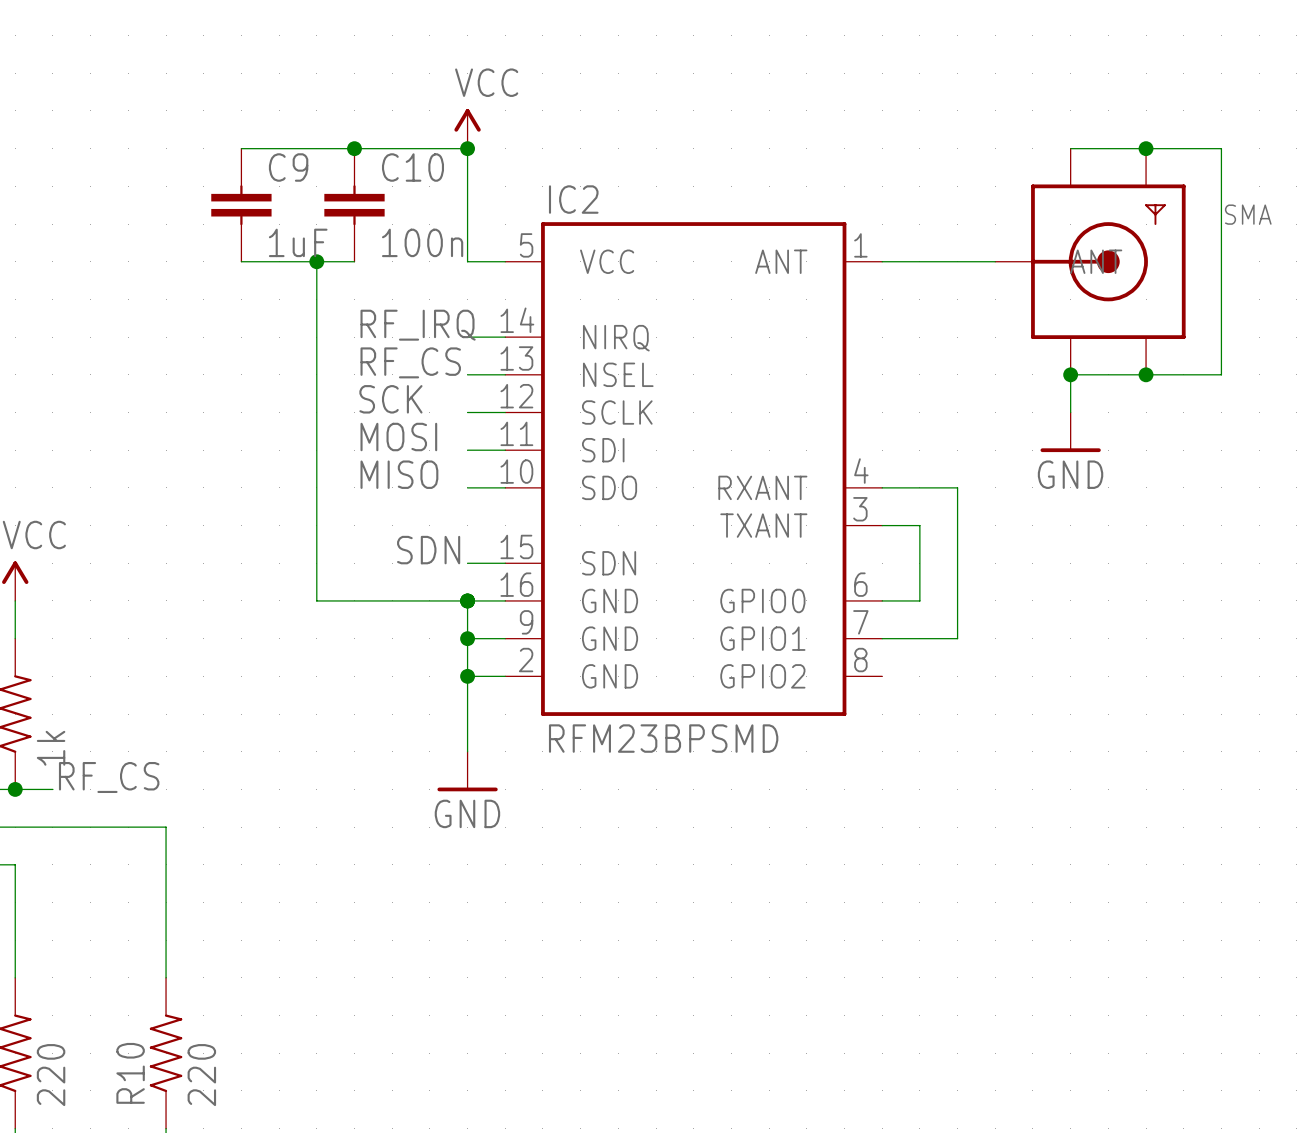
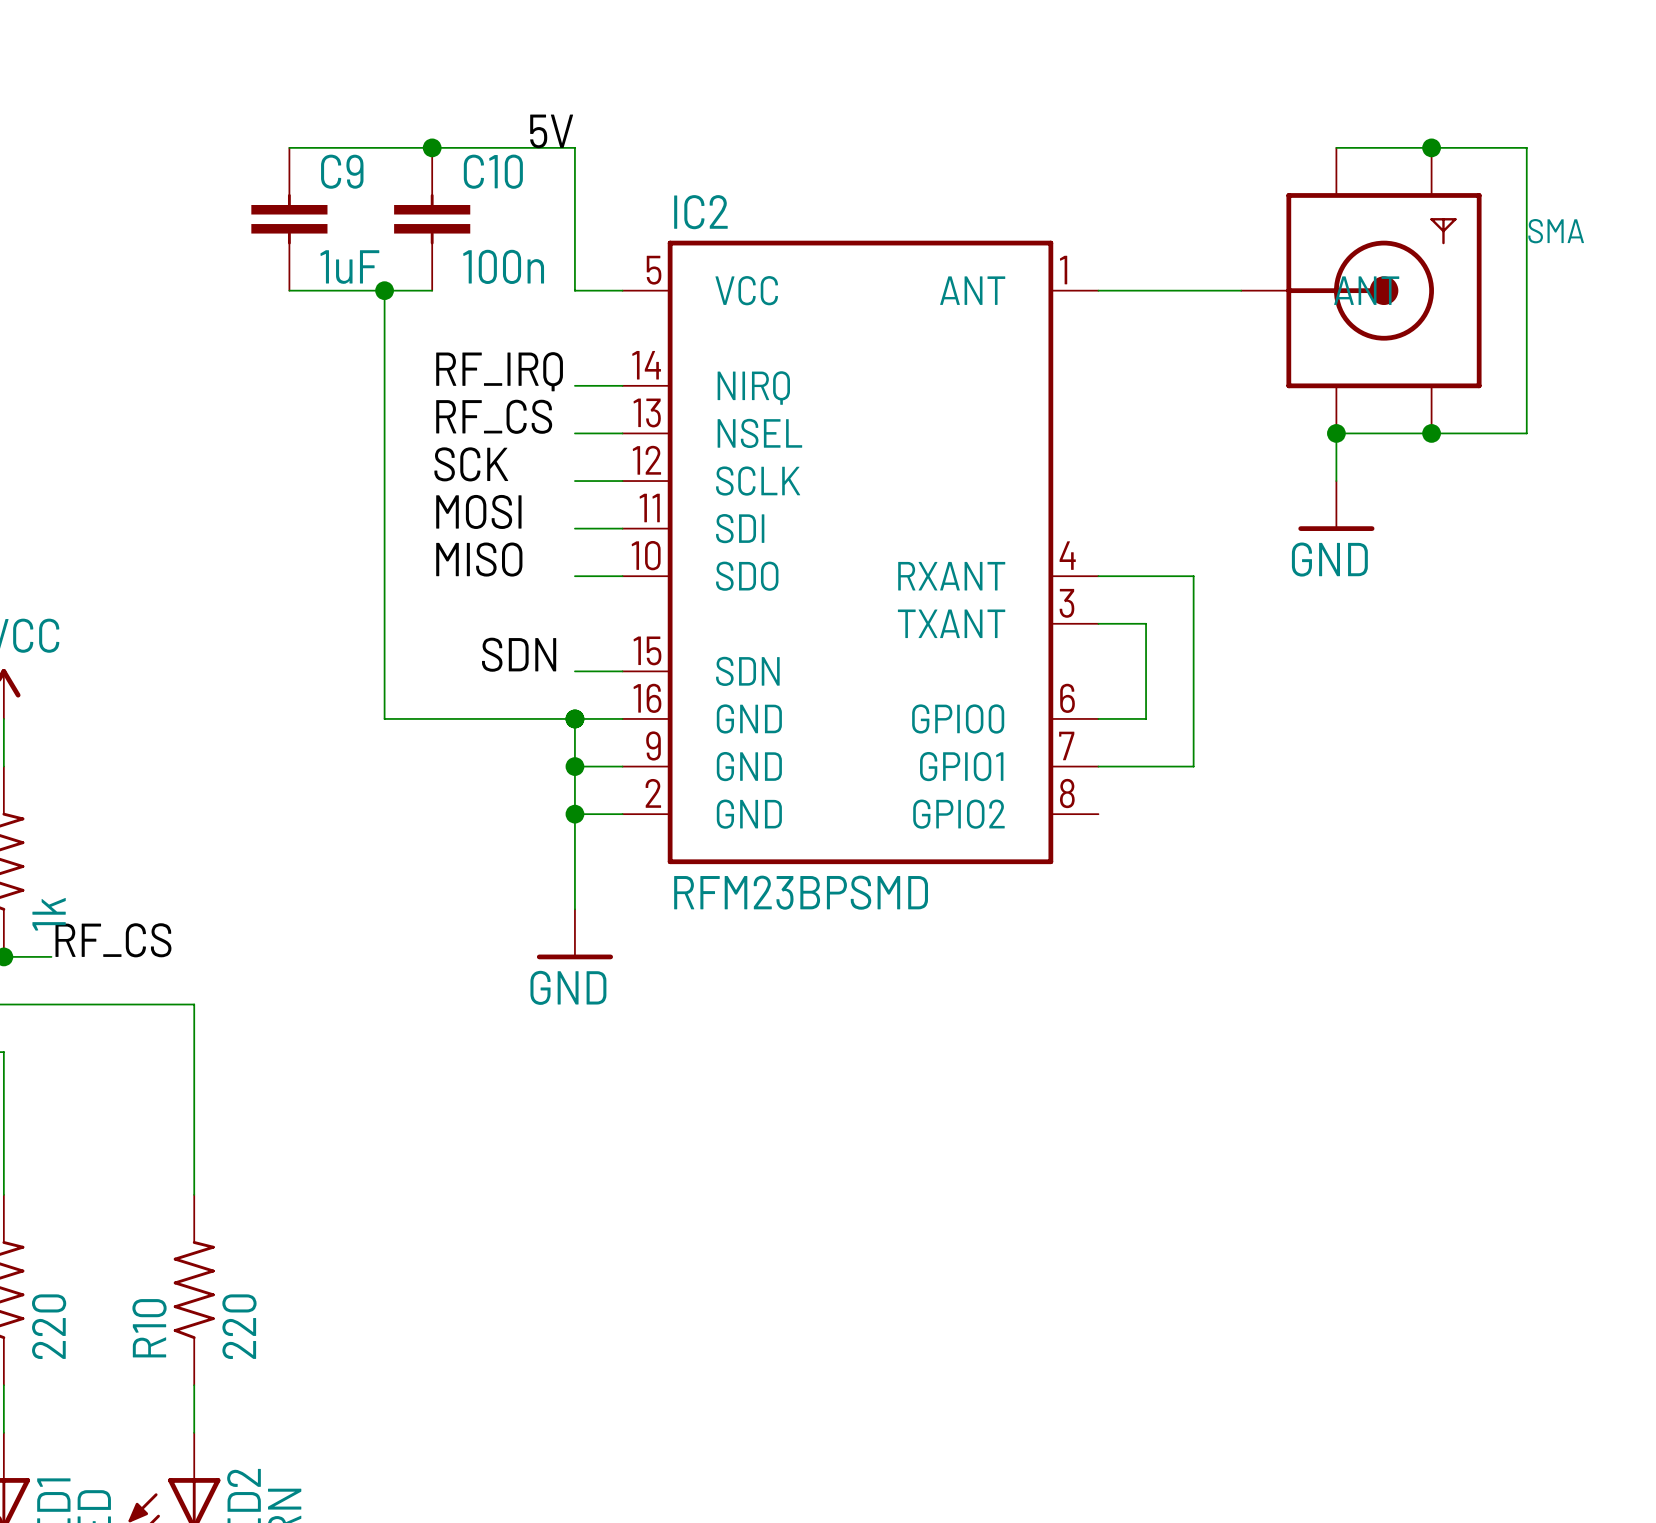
power symbol: VCC (467, 128) -> none
label: none -> 5V (551, 131)
junction: (467, 148) -> none

